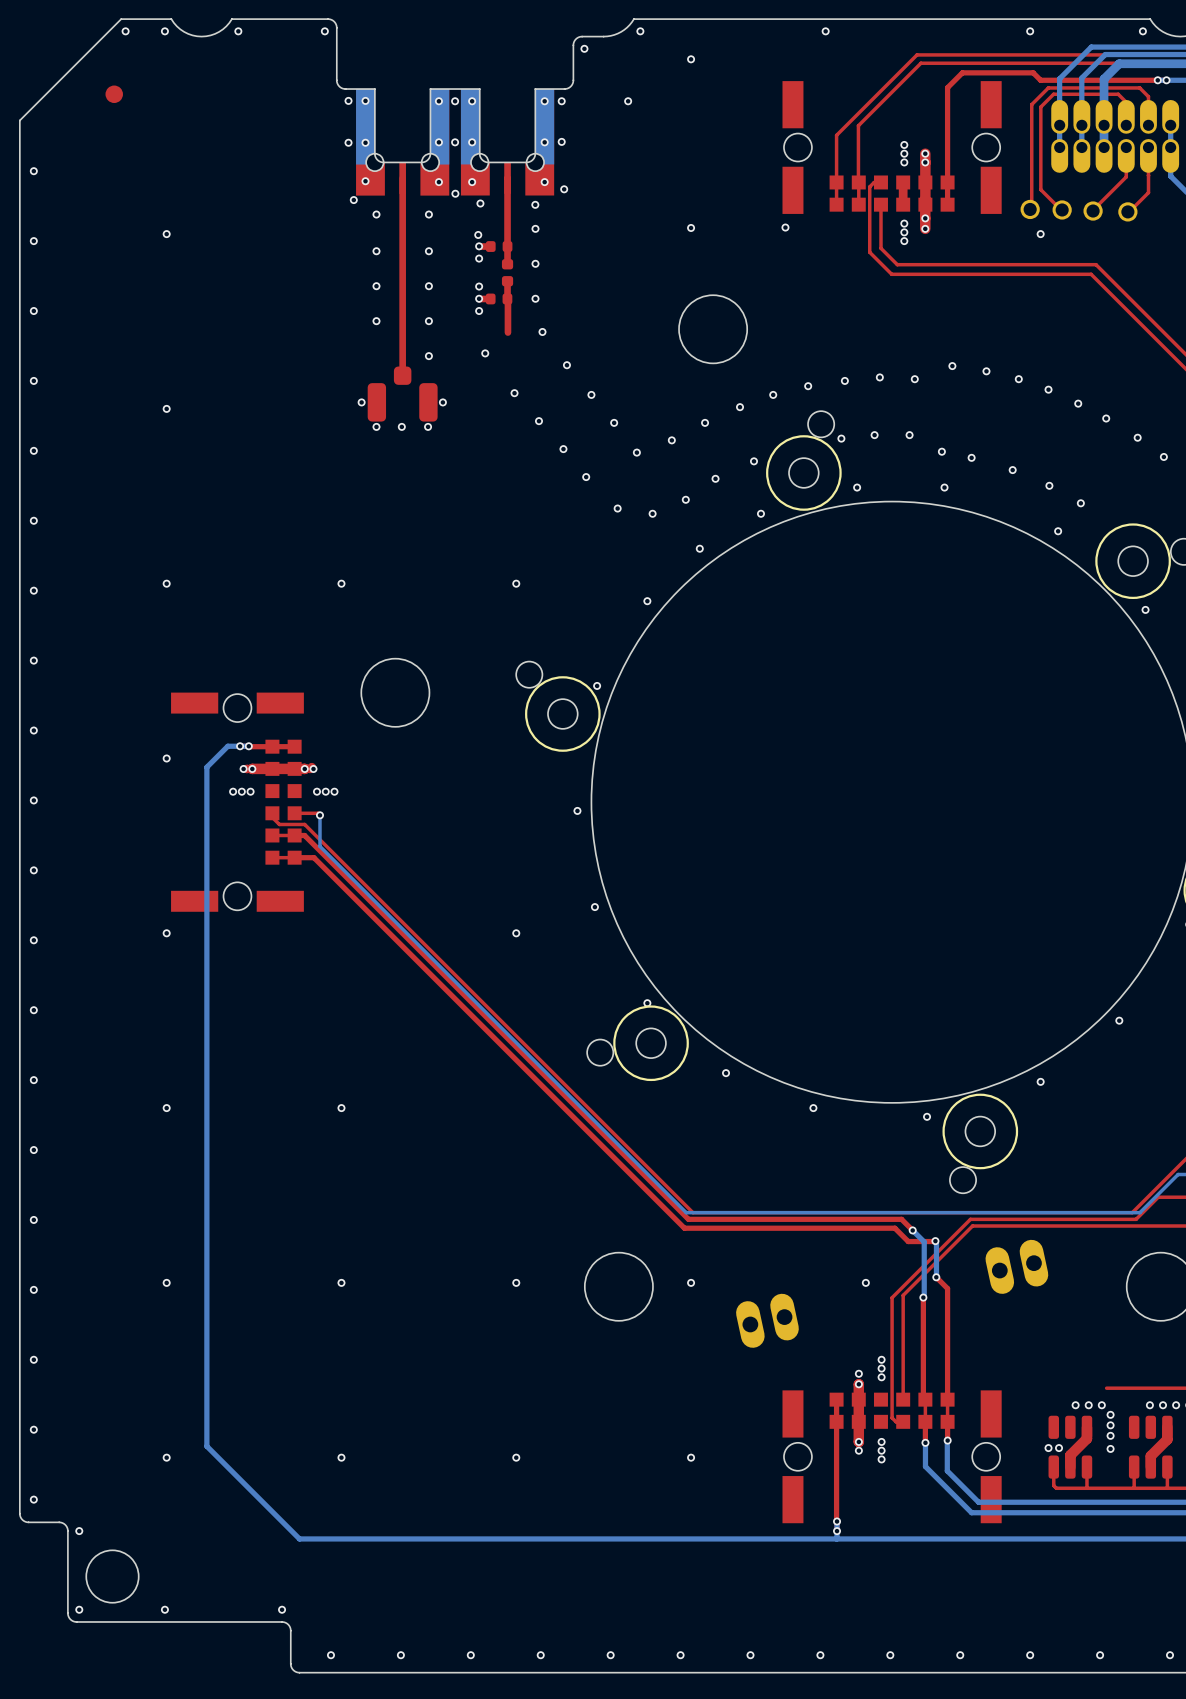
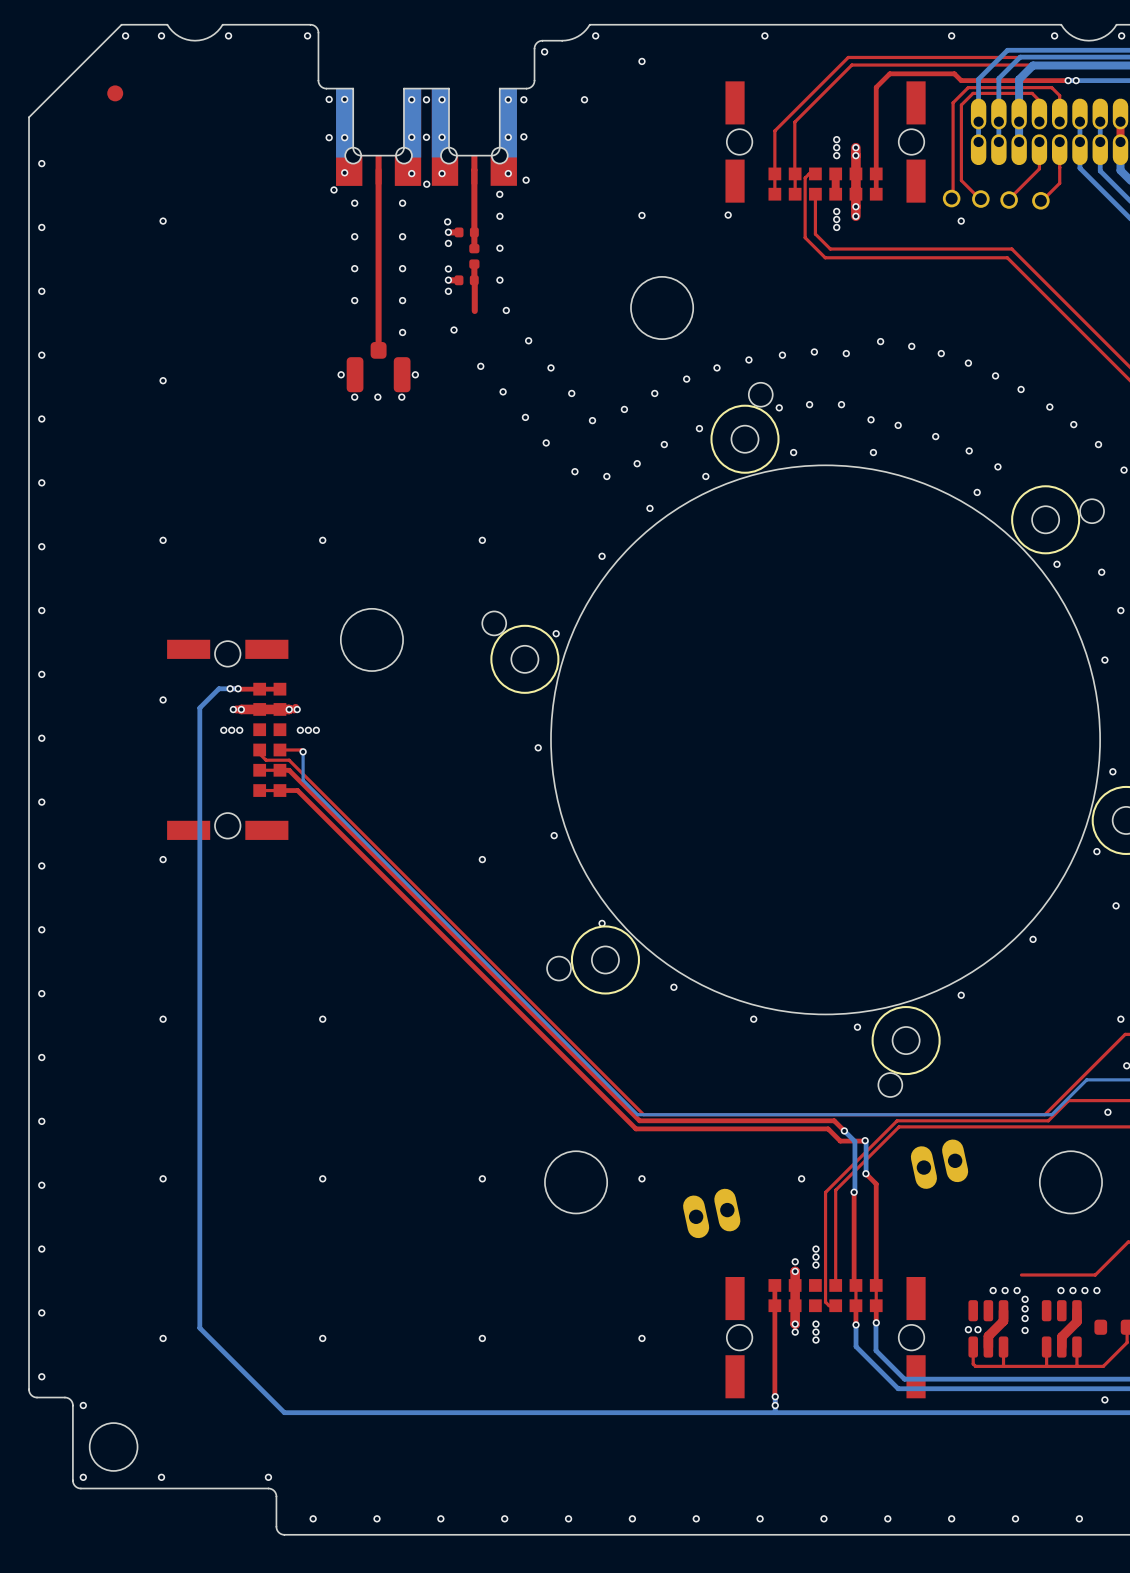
via: (480, 203) -> none

